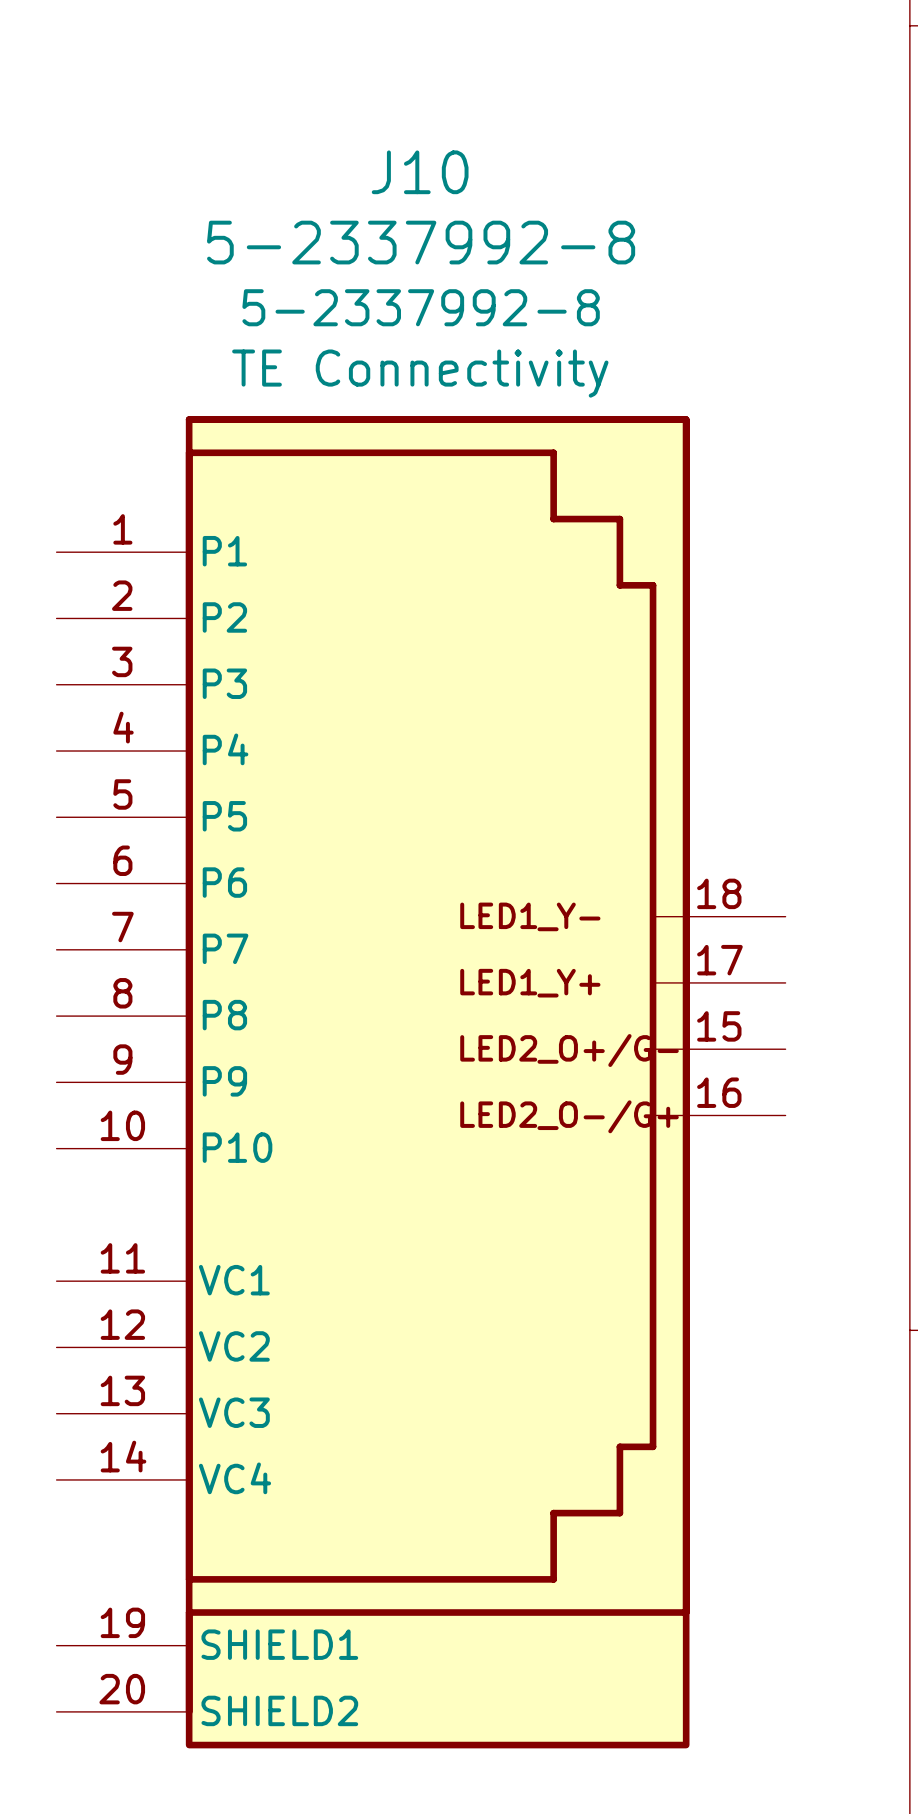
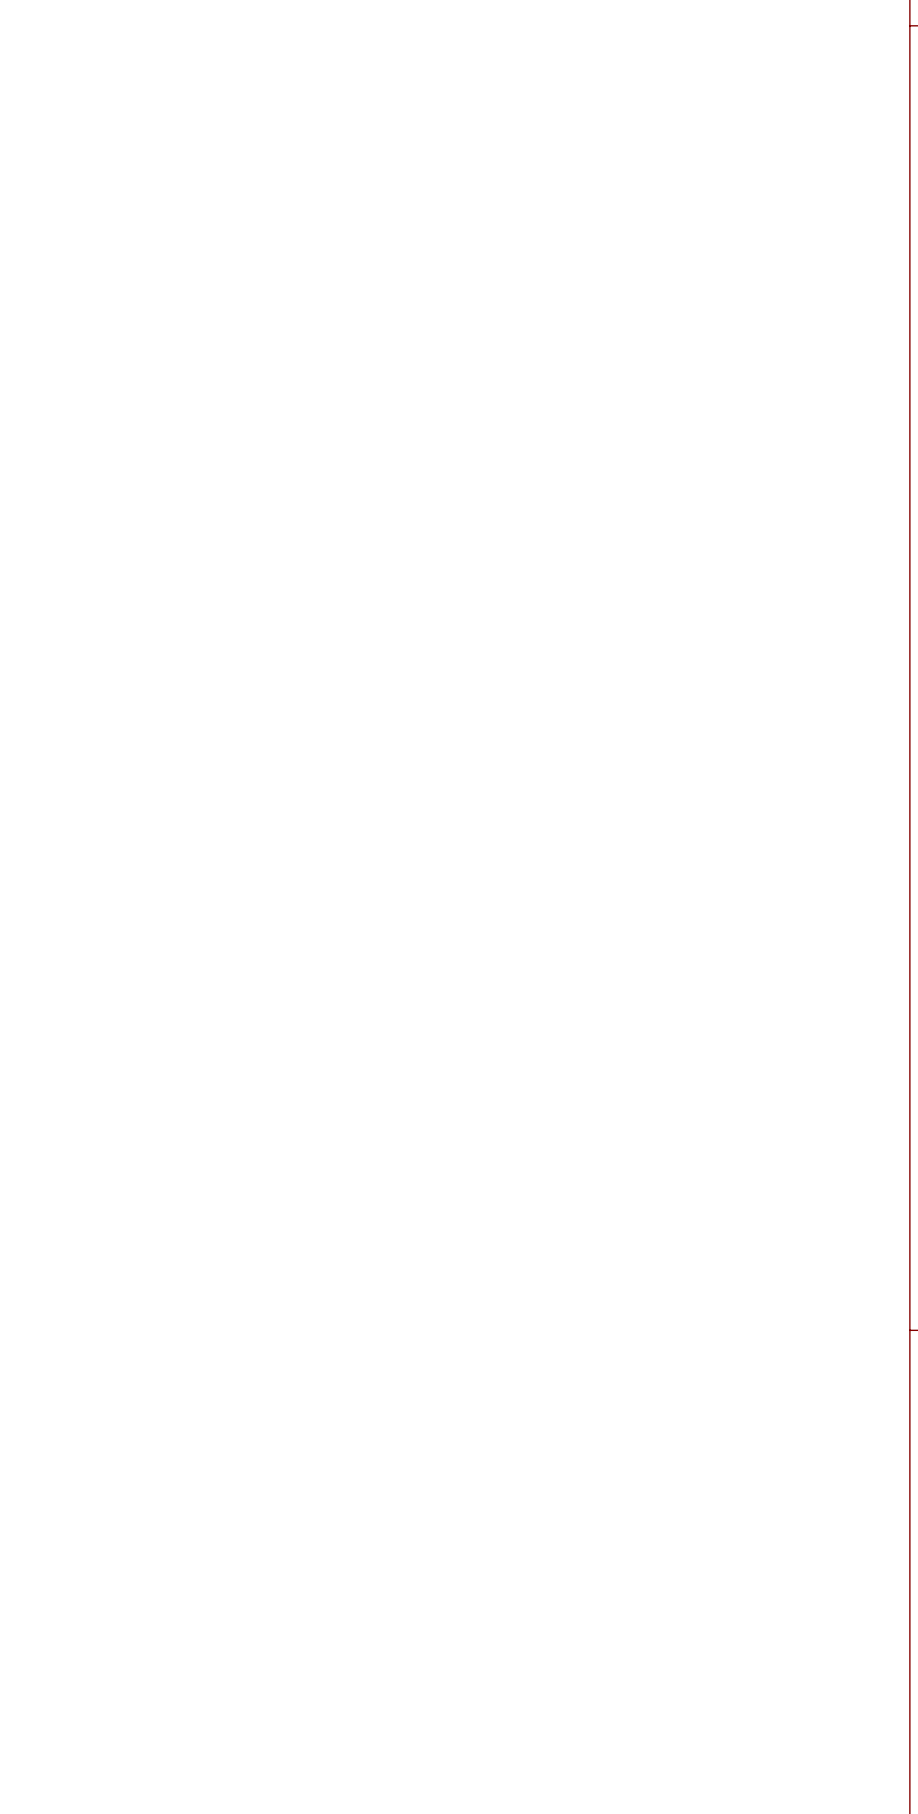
J10: 5-2337992-8 (421, 1082) -> none

